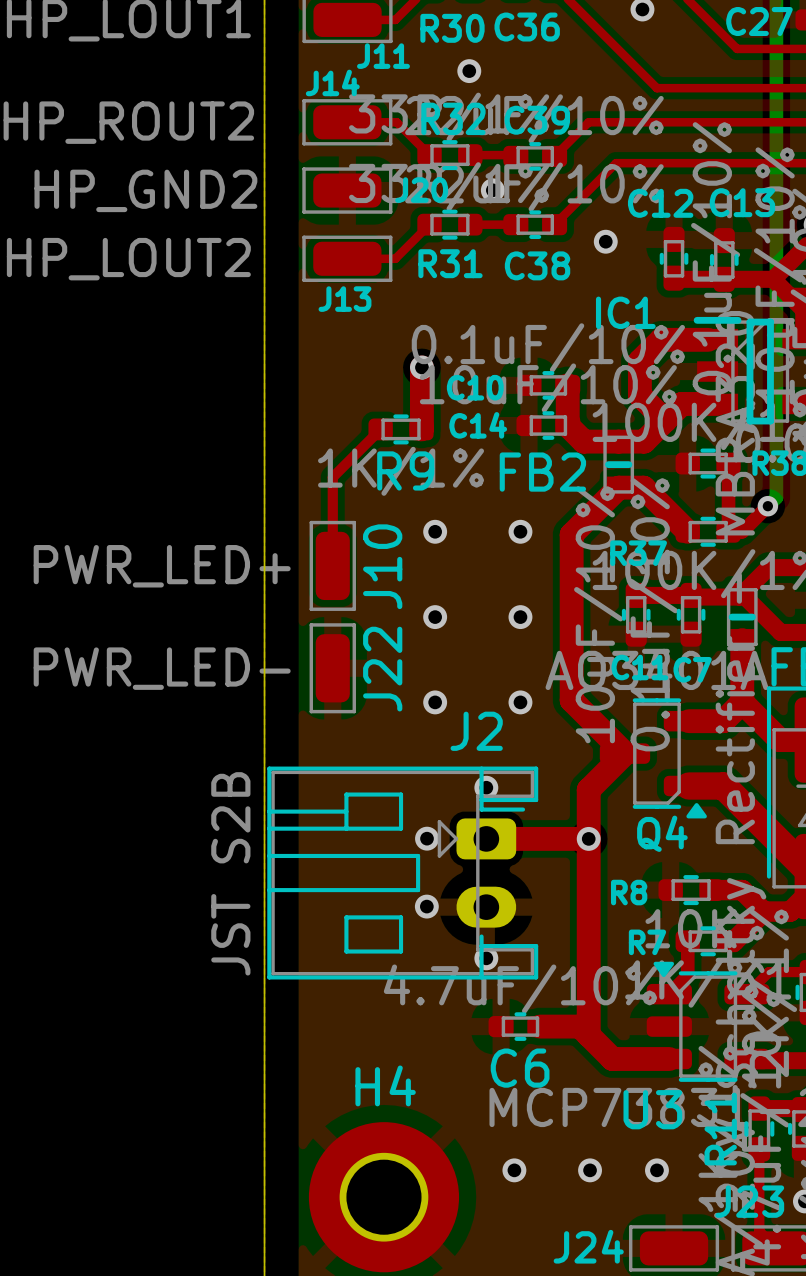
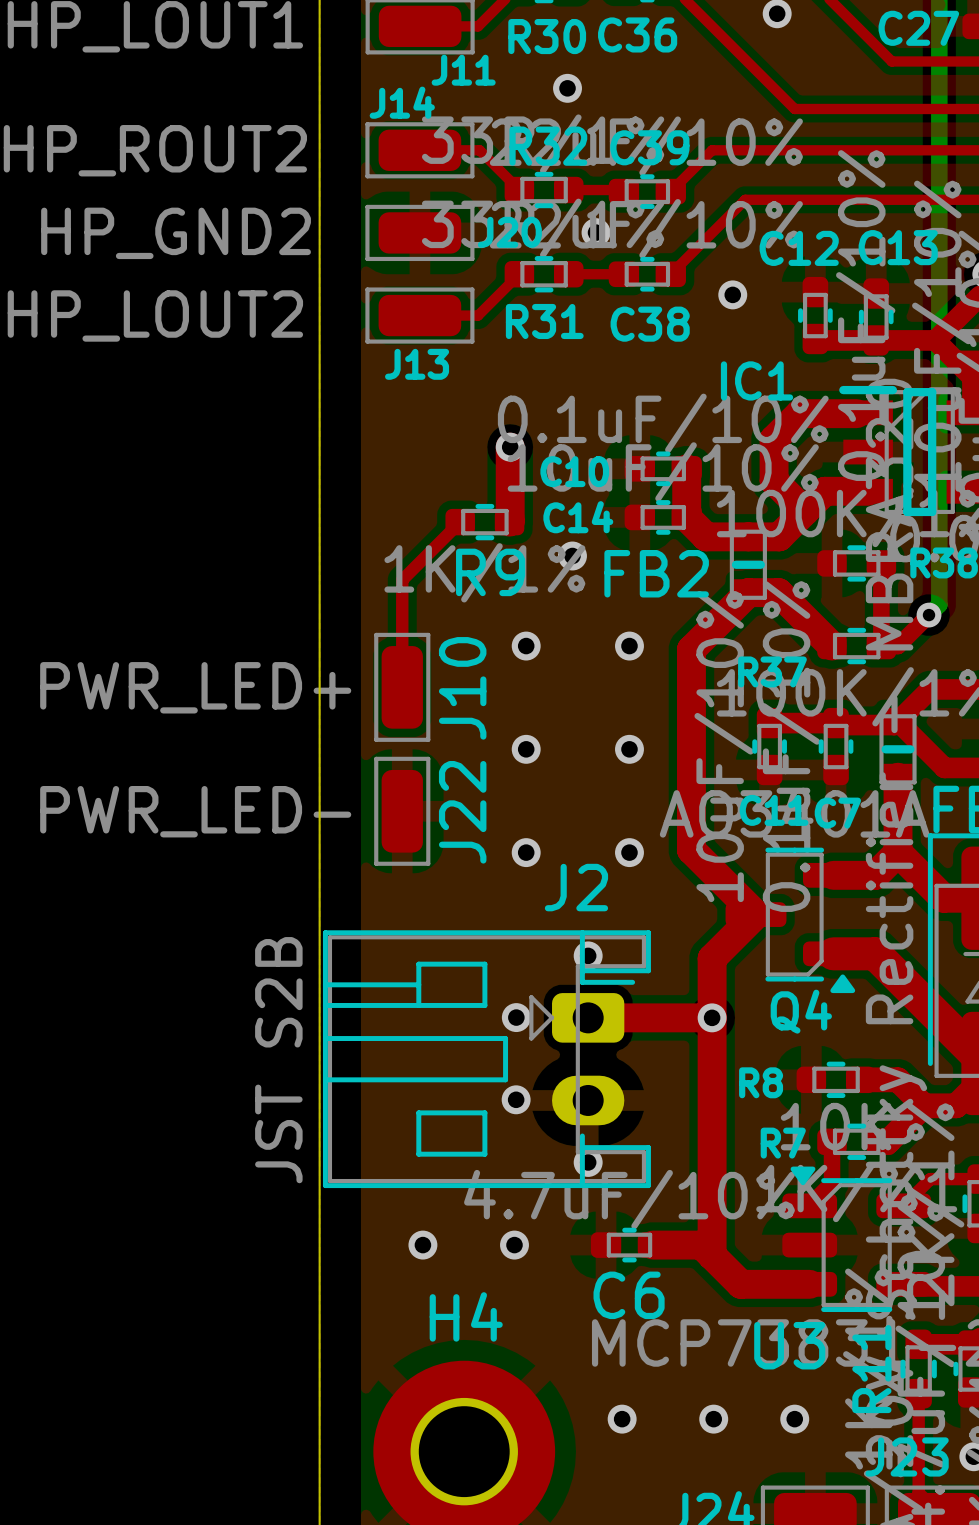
via: none -> (572, 556)
via: none -> (422, 1245)
via: none -> (514, 1245)

